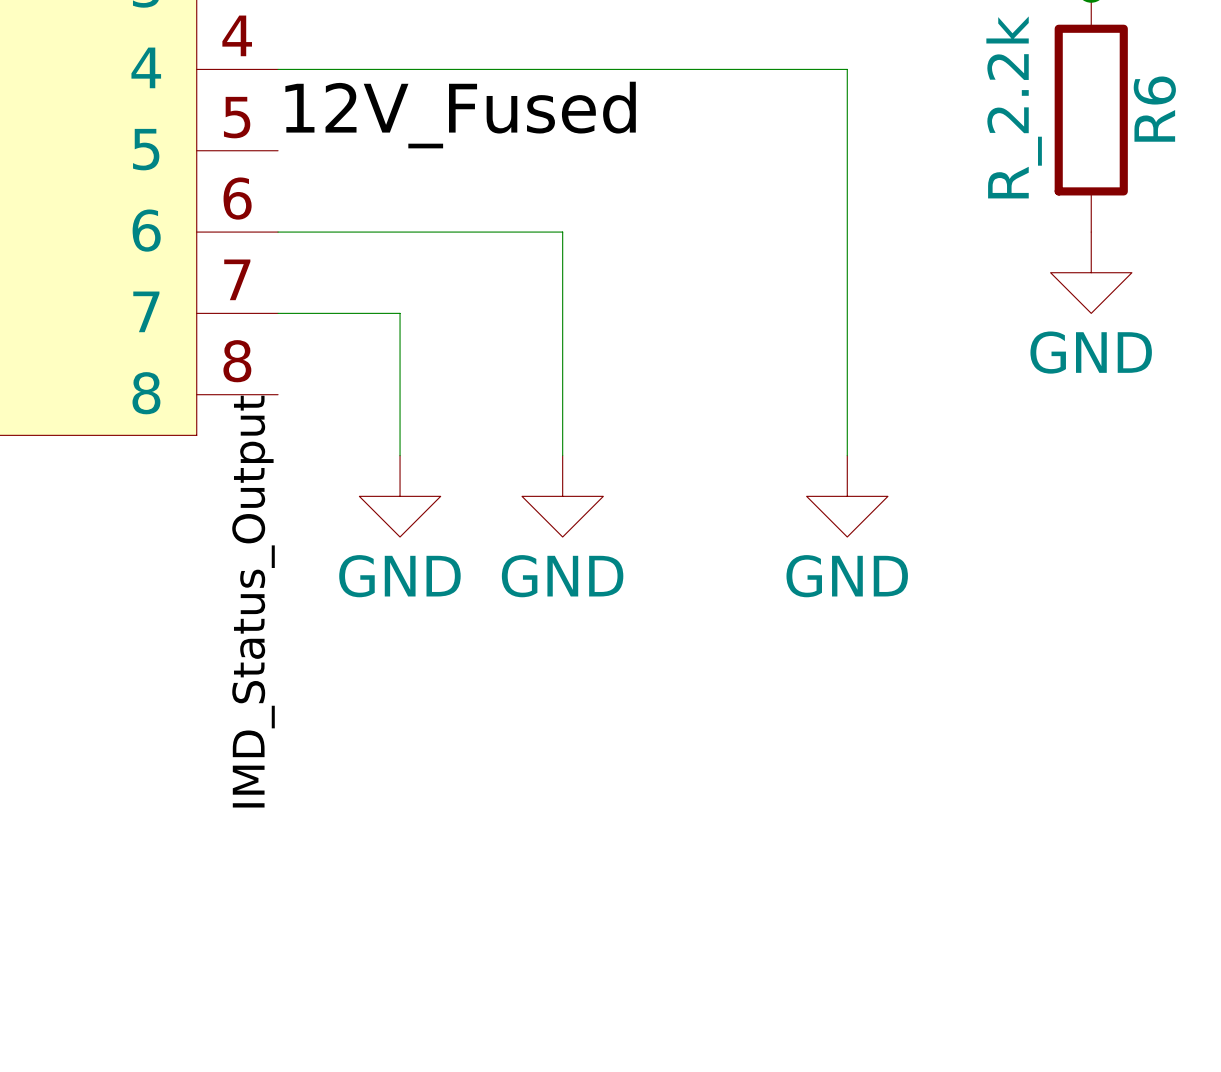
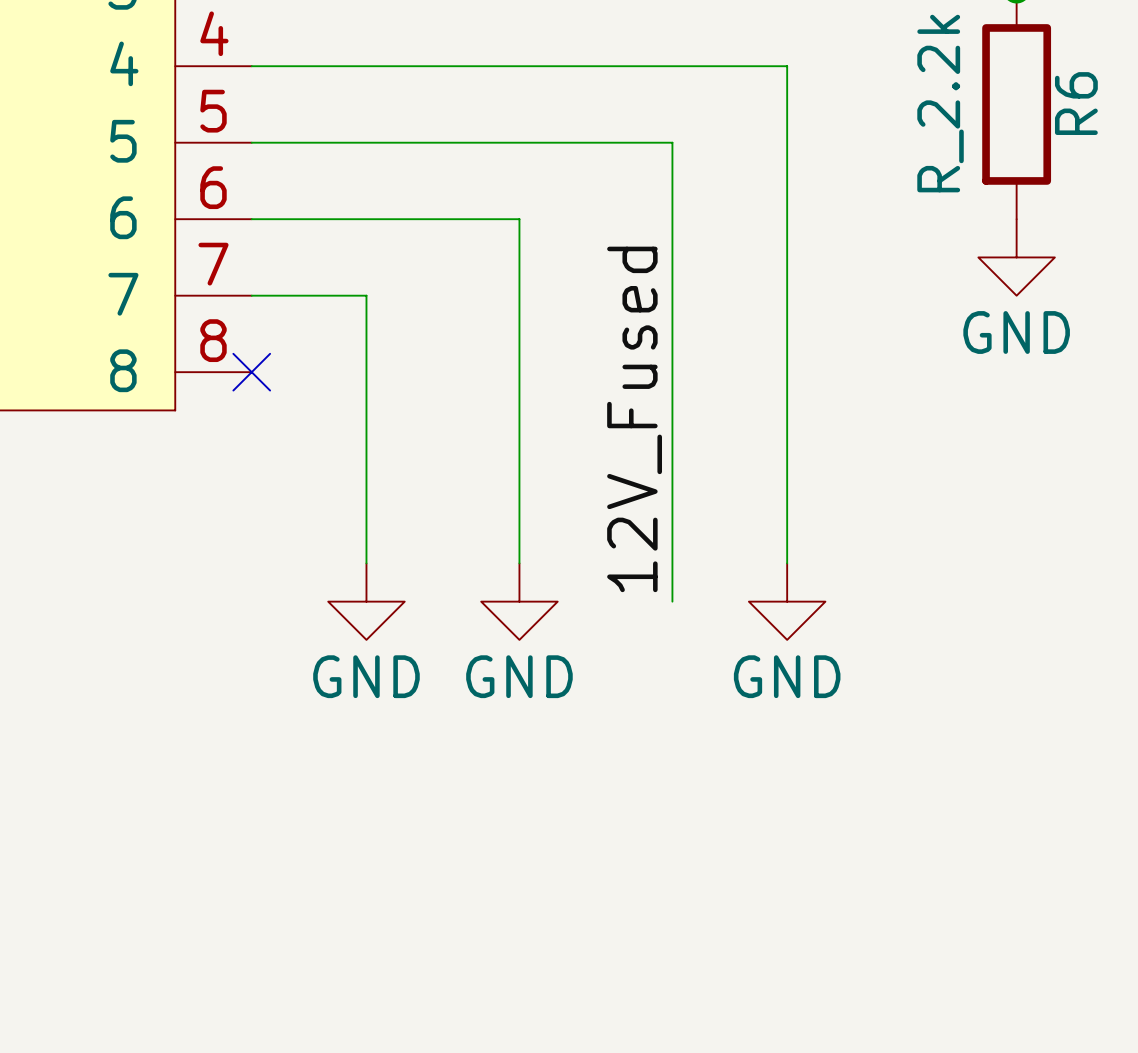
label rotation: 0° (460, 115) -> 90° counterclockwise (634, 419)
wire: none -> (251, 142) (672, 142) (672, 601)
no-connect mark: none -> (251, 372)
wire: none -> (366, 429) (366, 563)
wire: none -> (519, 429) (519, 563)
wire: none -> (787, 429) (787, 563)
power symbol: GND (400, 496) -> none
power symbol: GND (562, 496) -> none
power symbol position: GND (847, 496) -> GND (787, 601)
label: IMD_Status_Output (253, 601) -> none
power symbol: none -> GND (366, 601)
power symbol: none -> GND (519, 601)

